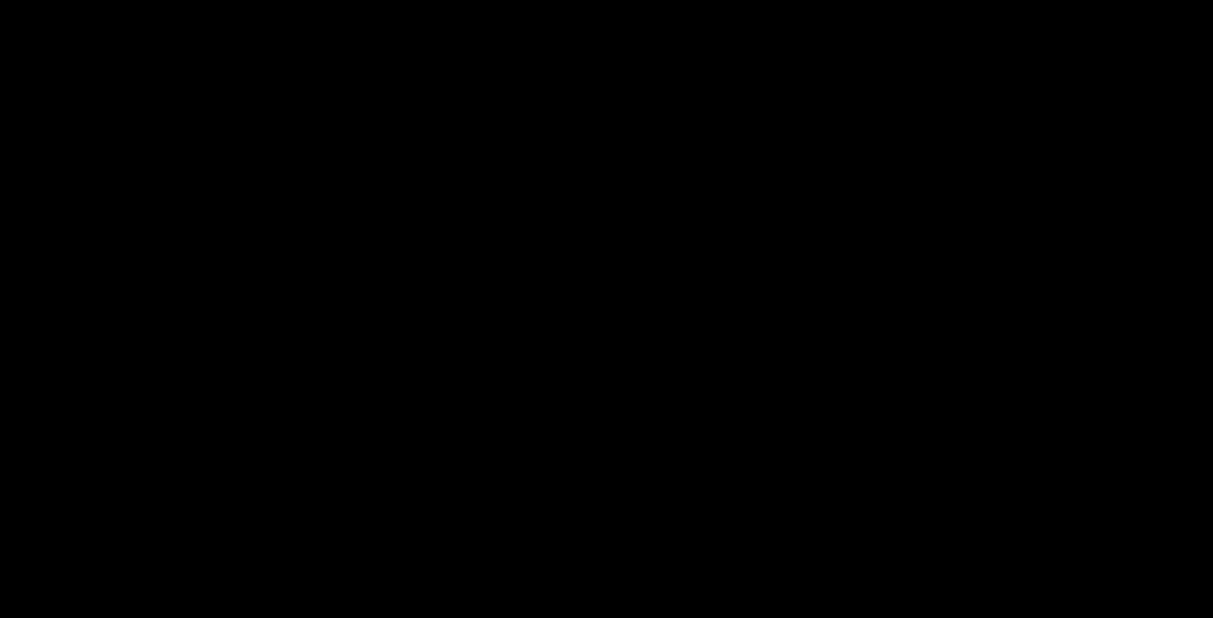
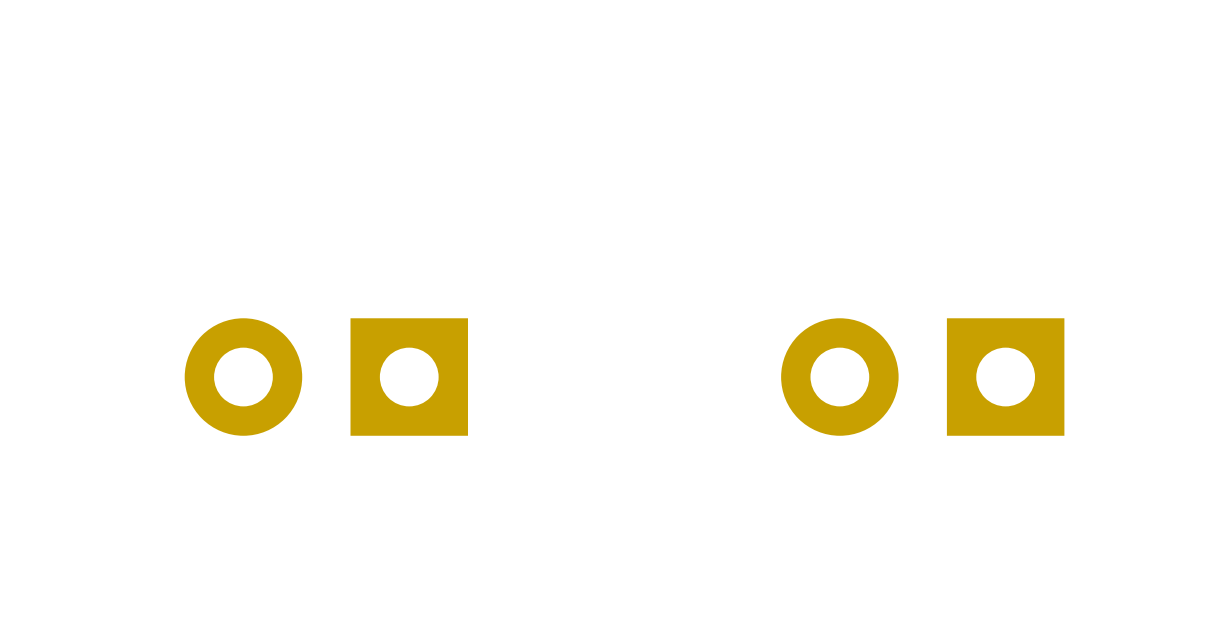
part: none -> (326, 377)
part: none -> (922, 377)

